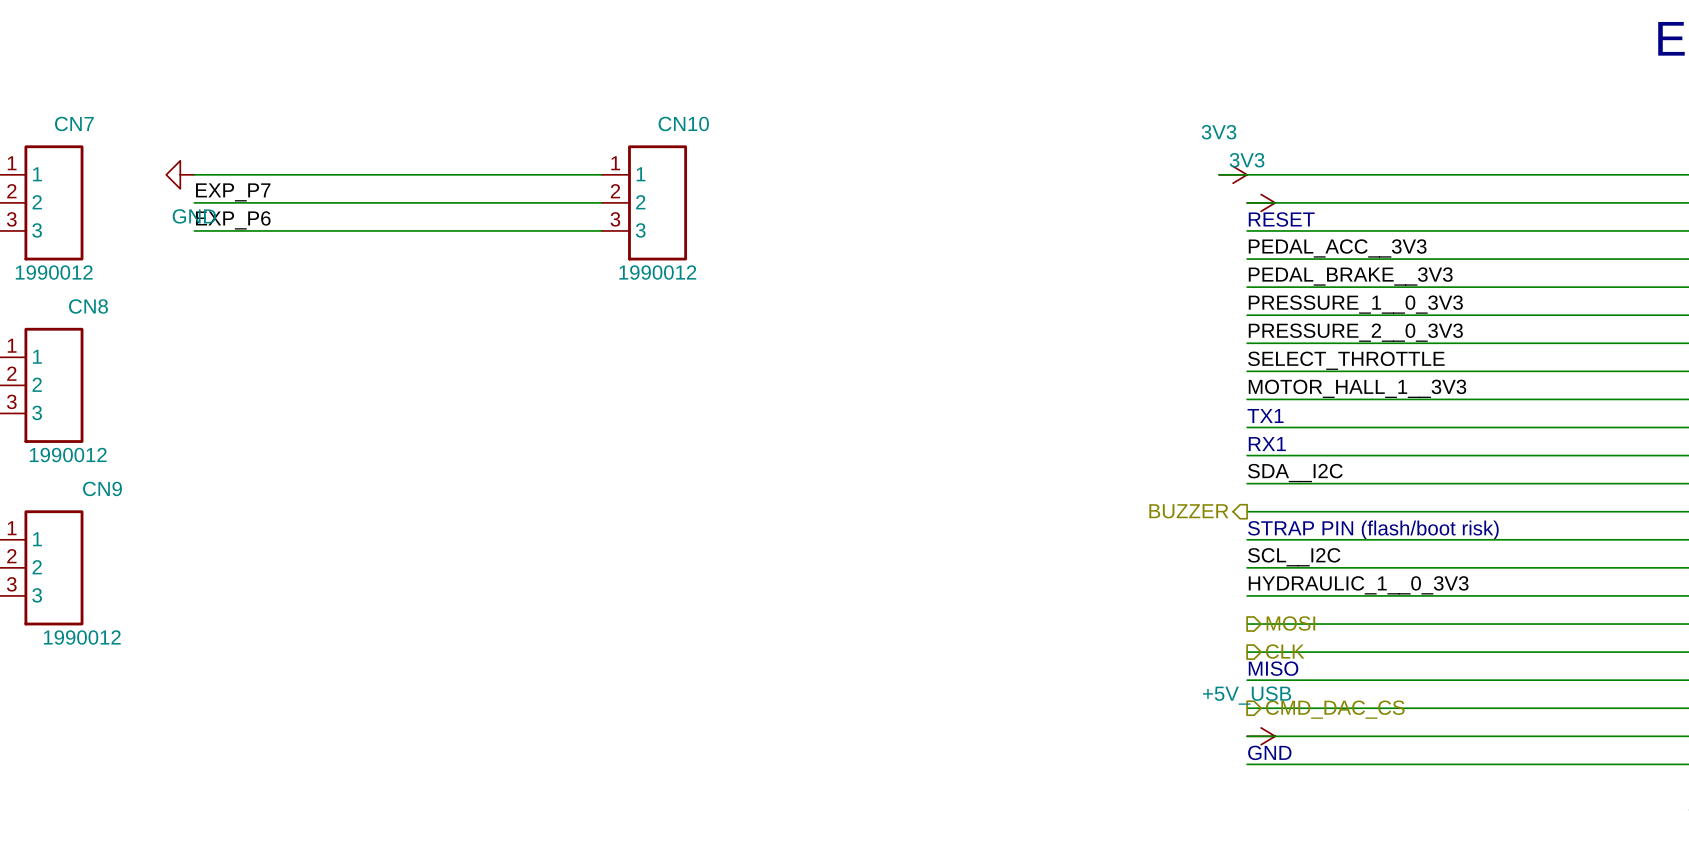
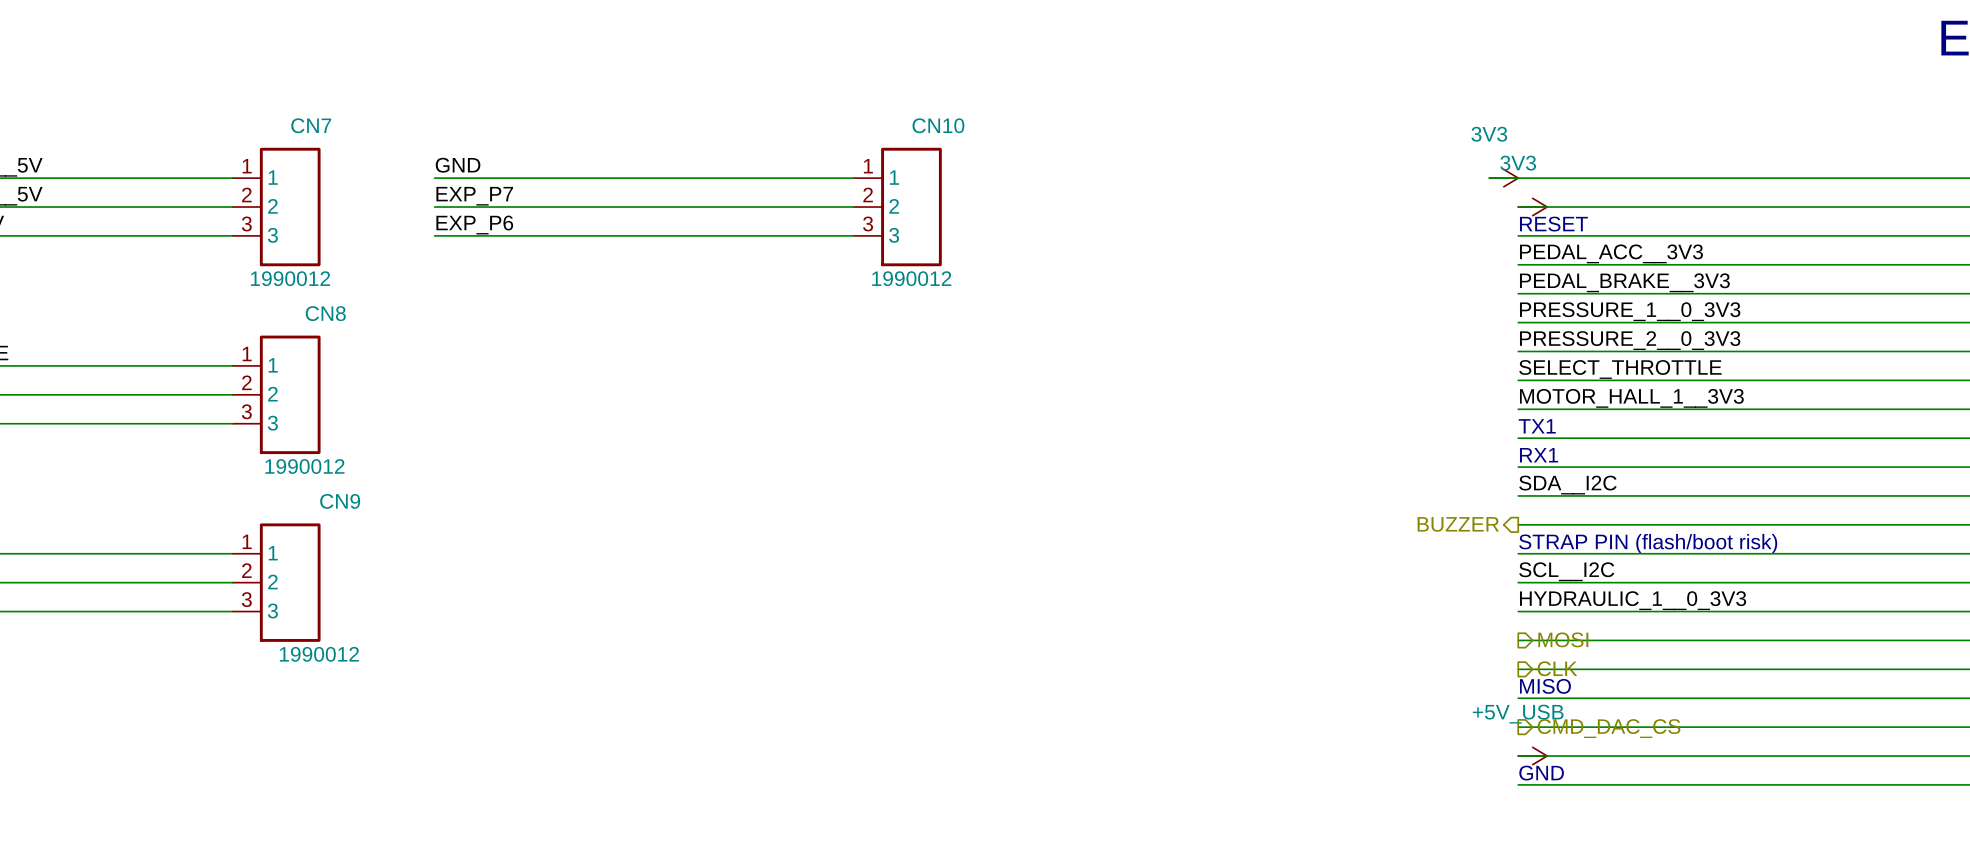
label: none -> GND (458, 165)
power symbol: GND (180, 174) -> none

